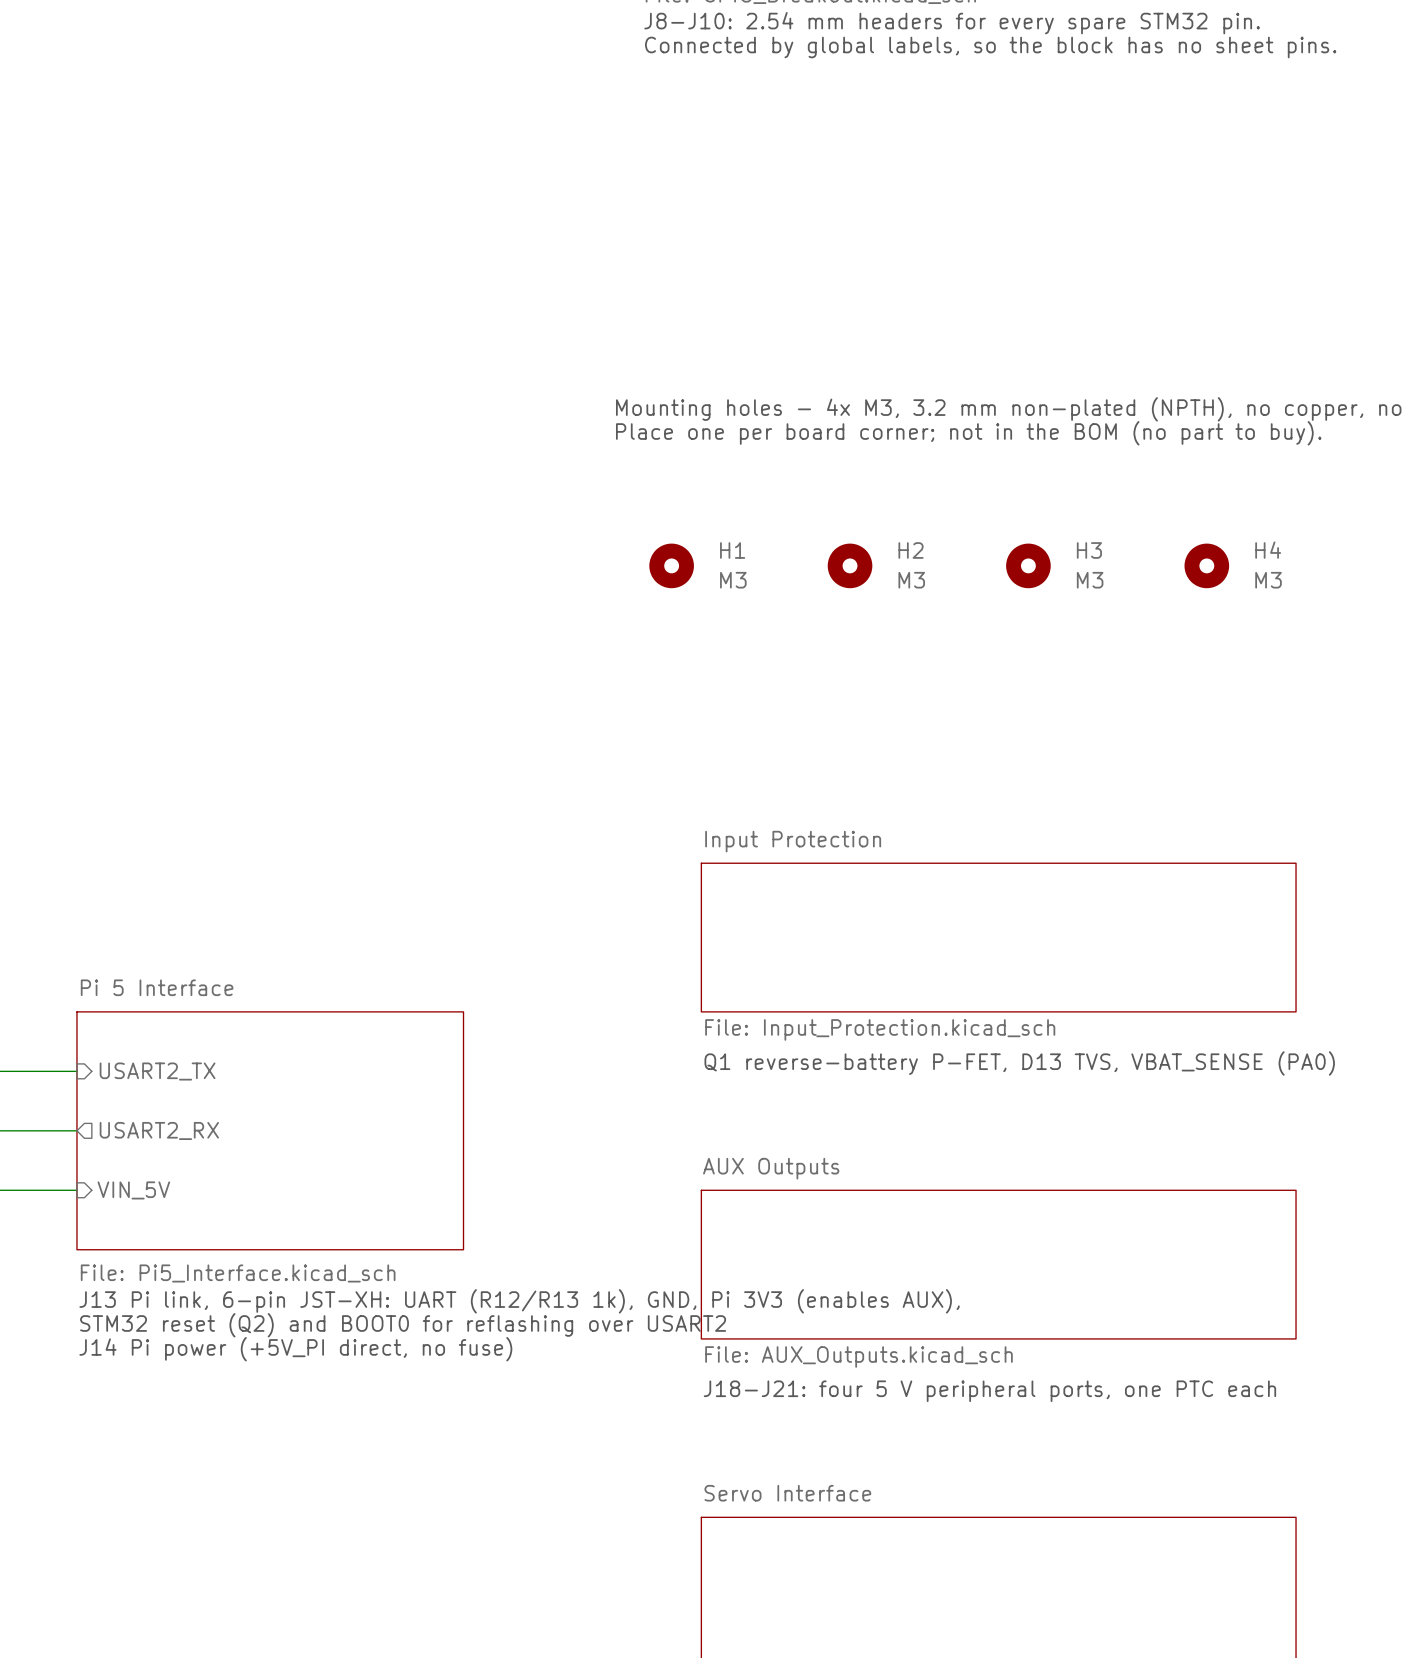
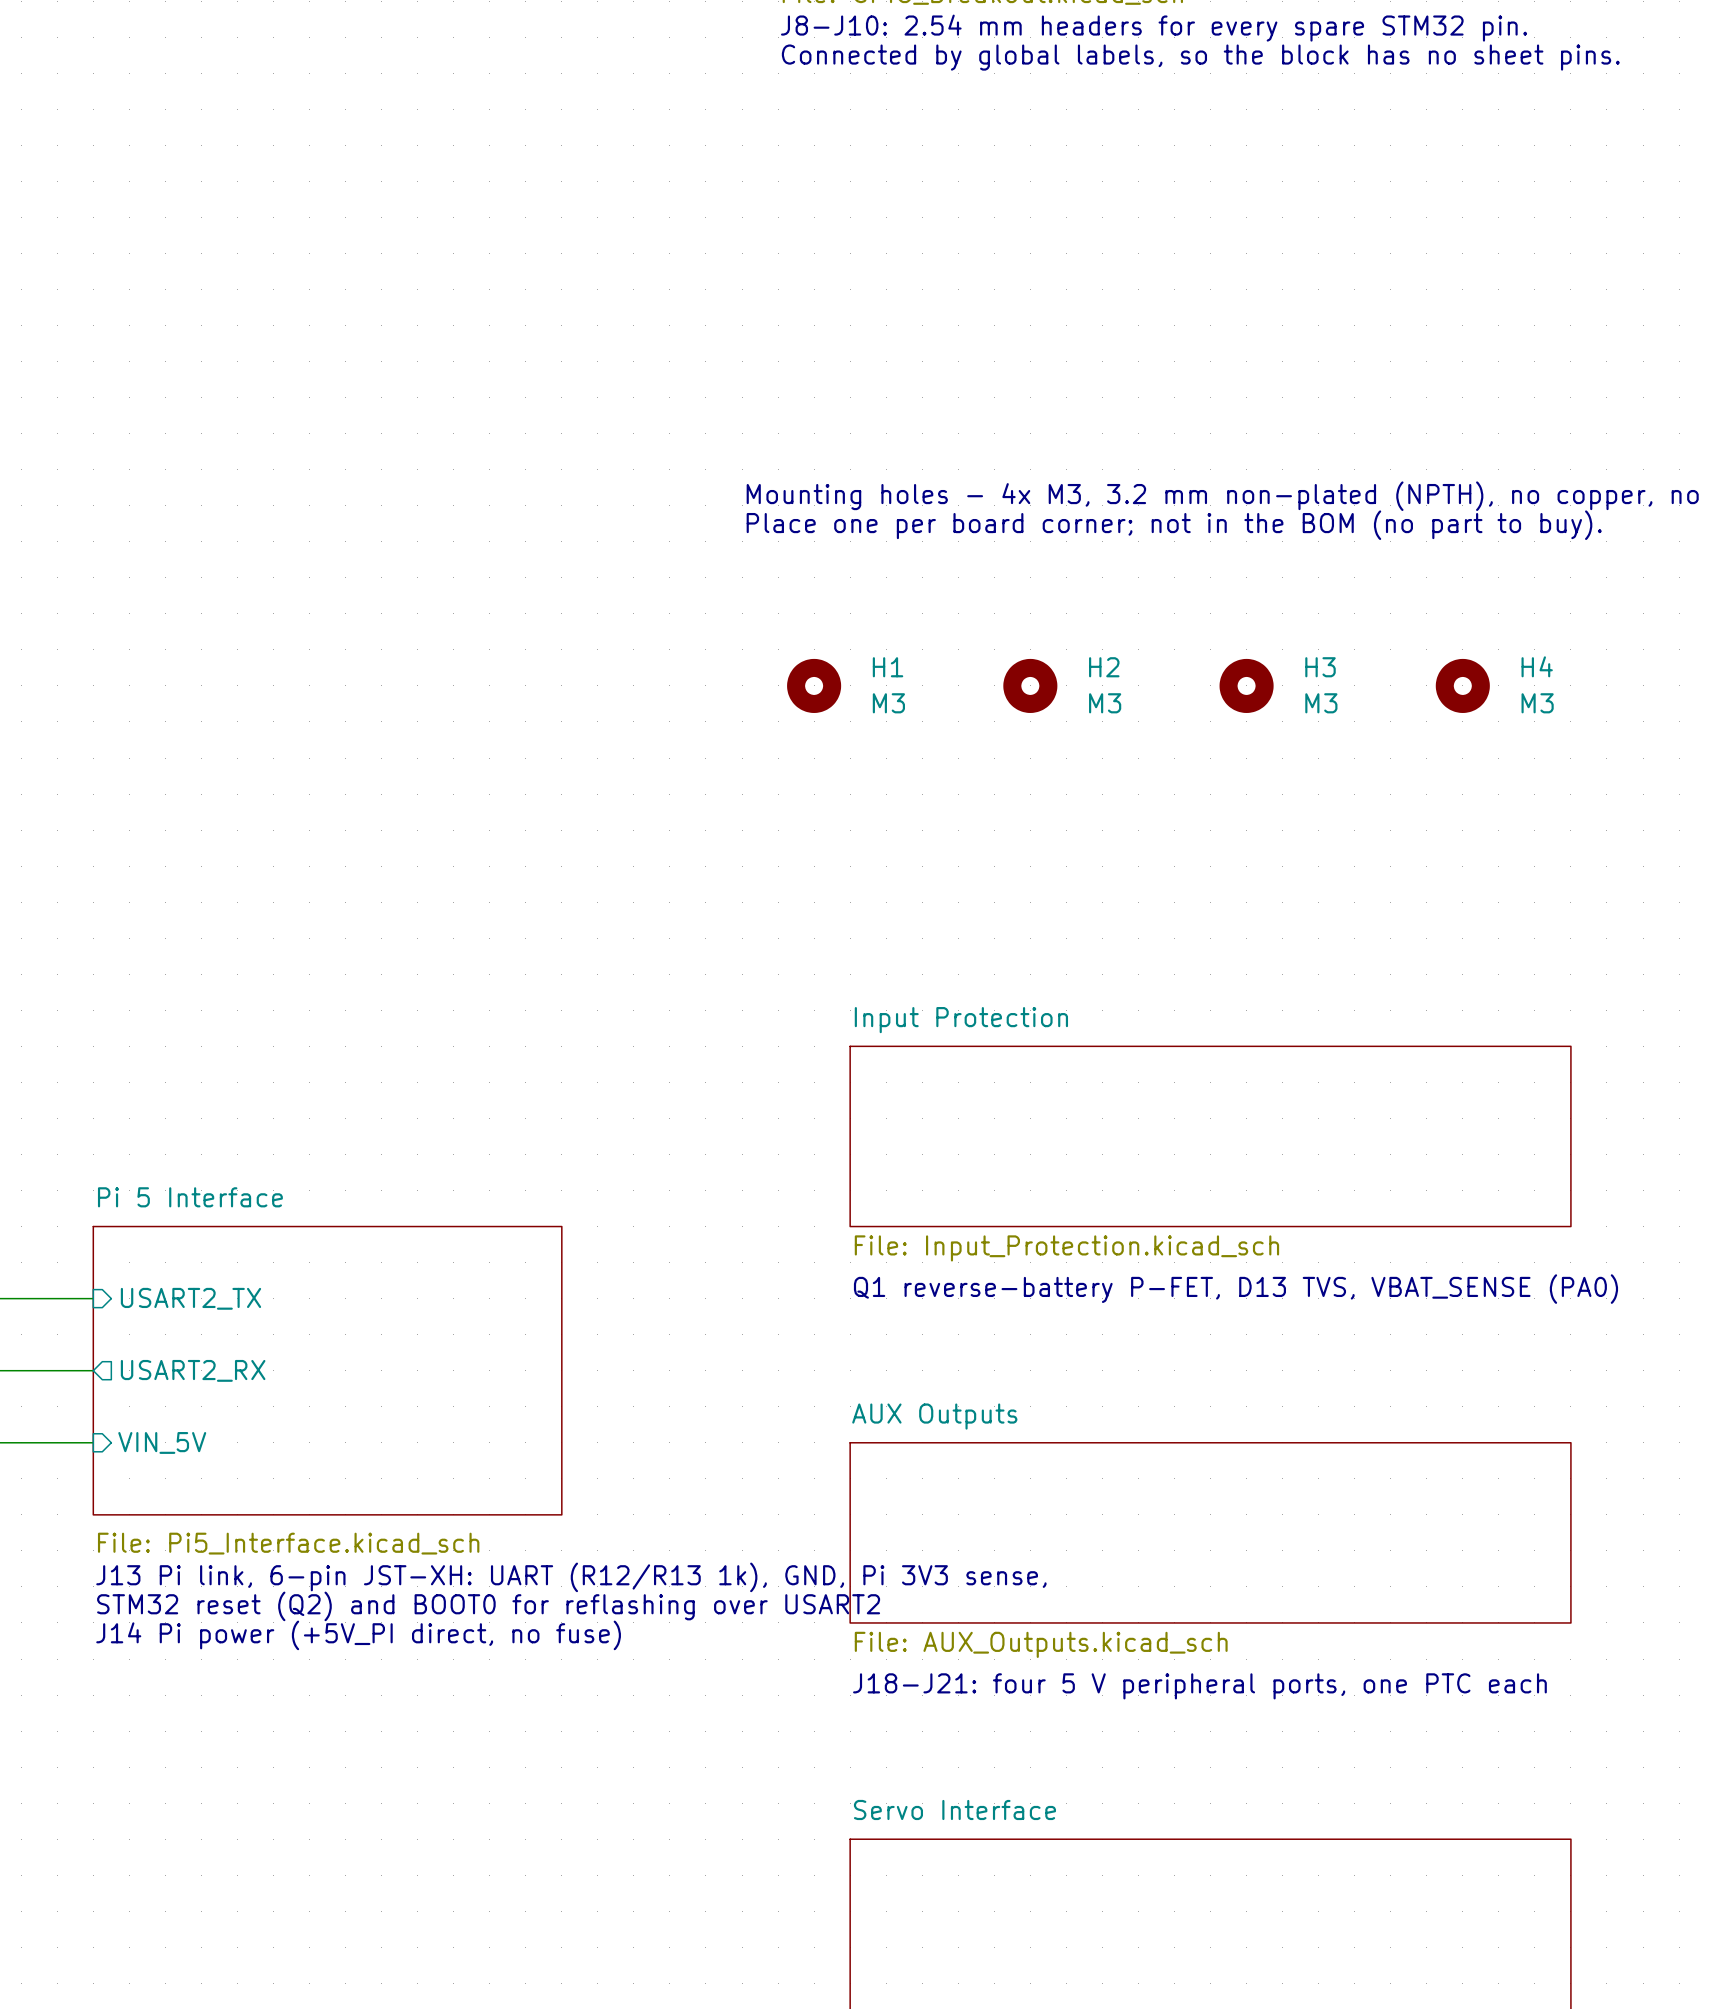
text: J13 Pi link, 6-pin JST-XH: UART (R12/R13 1k), GND, Pi 3V3 (enables AUX), (519, 1301) -> J13 Pi link, 6-pin JST-XH: UART (R12/R13 1k), GND, Pi 3V3 sense, (571, 1577)

